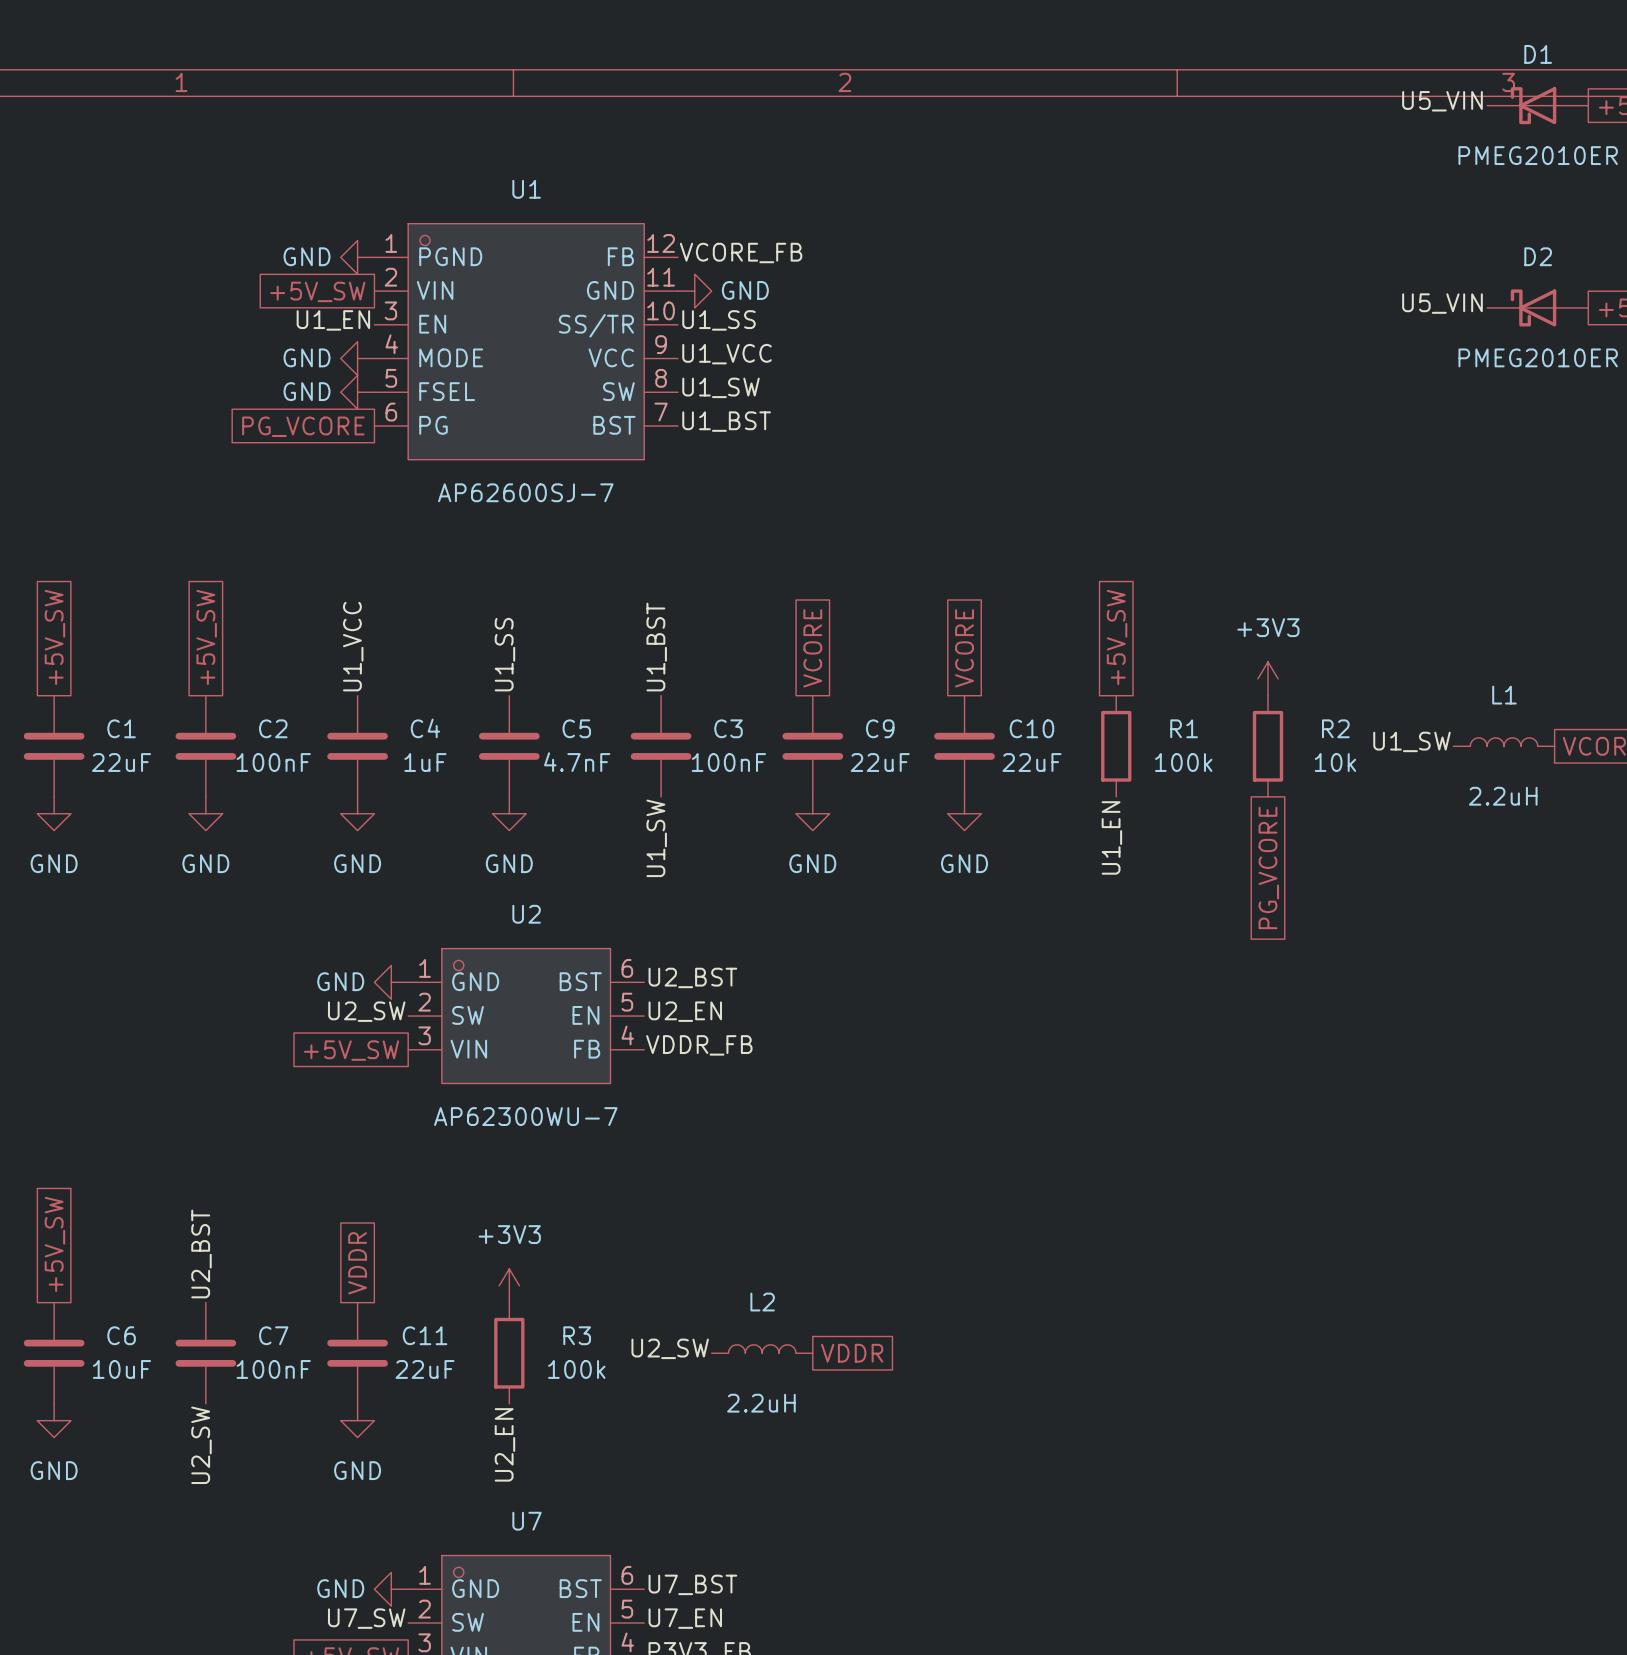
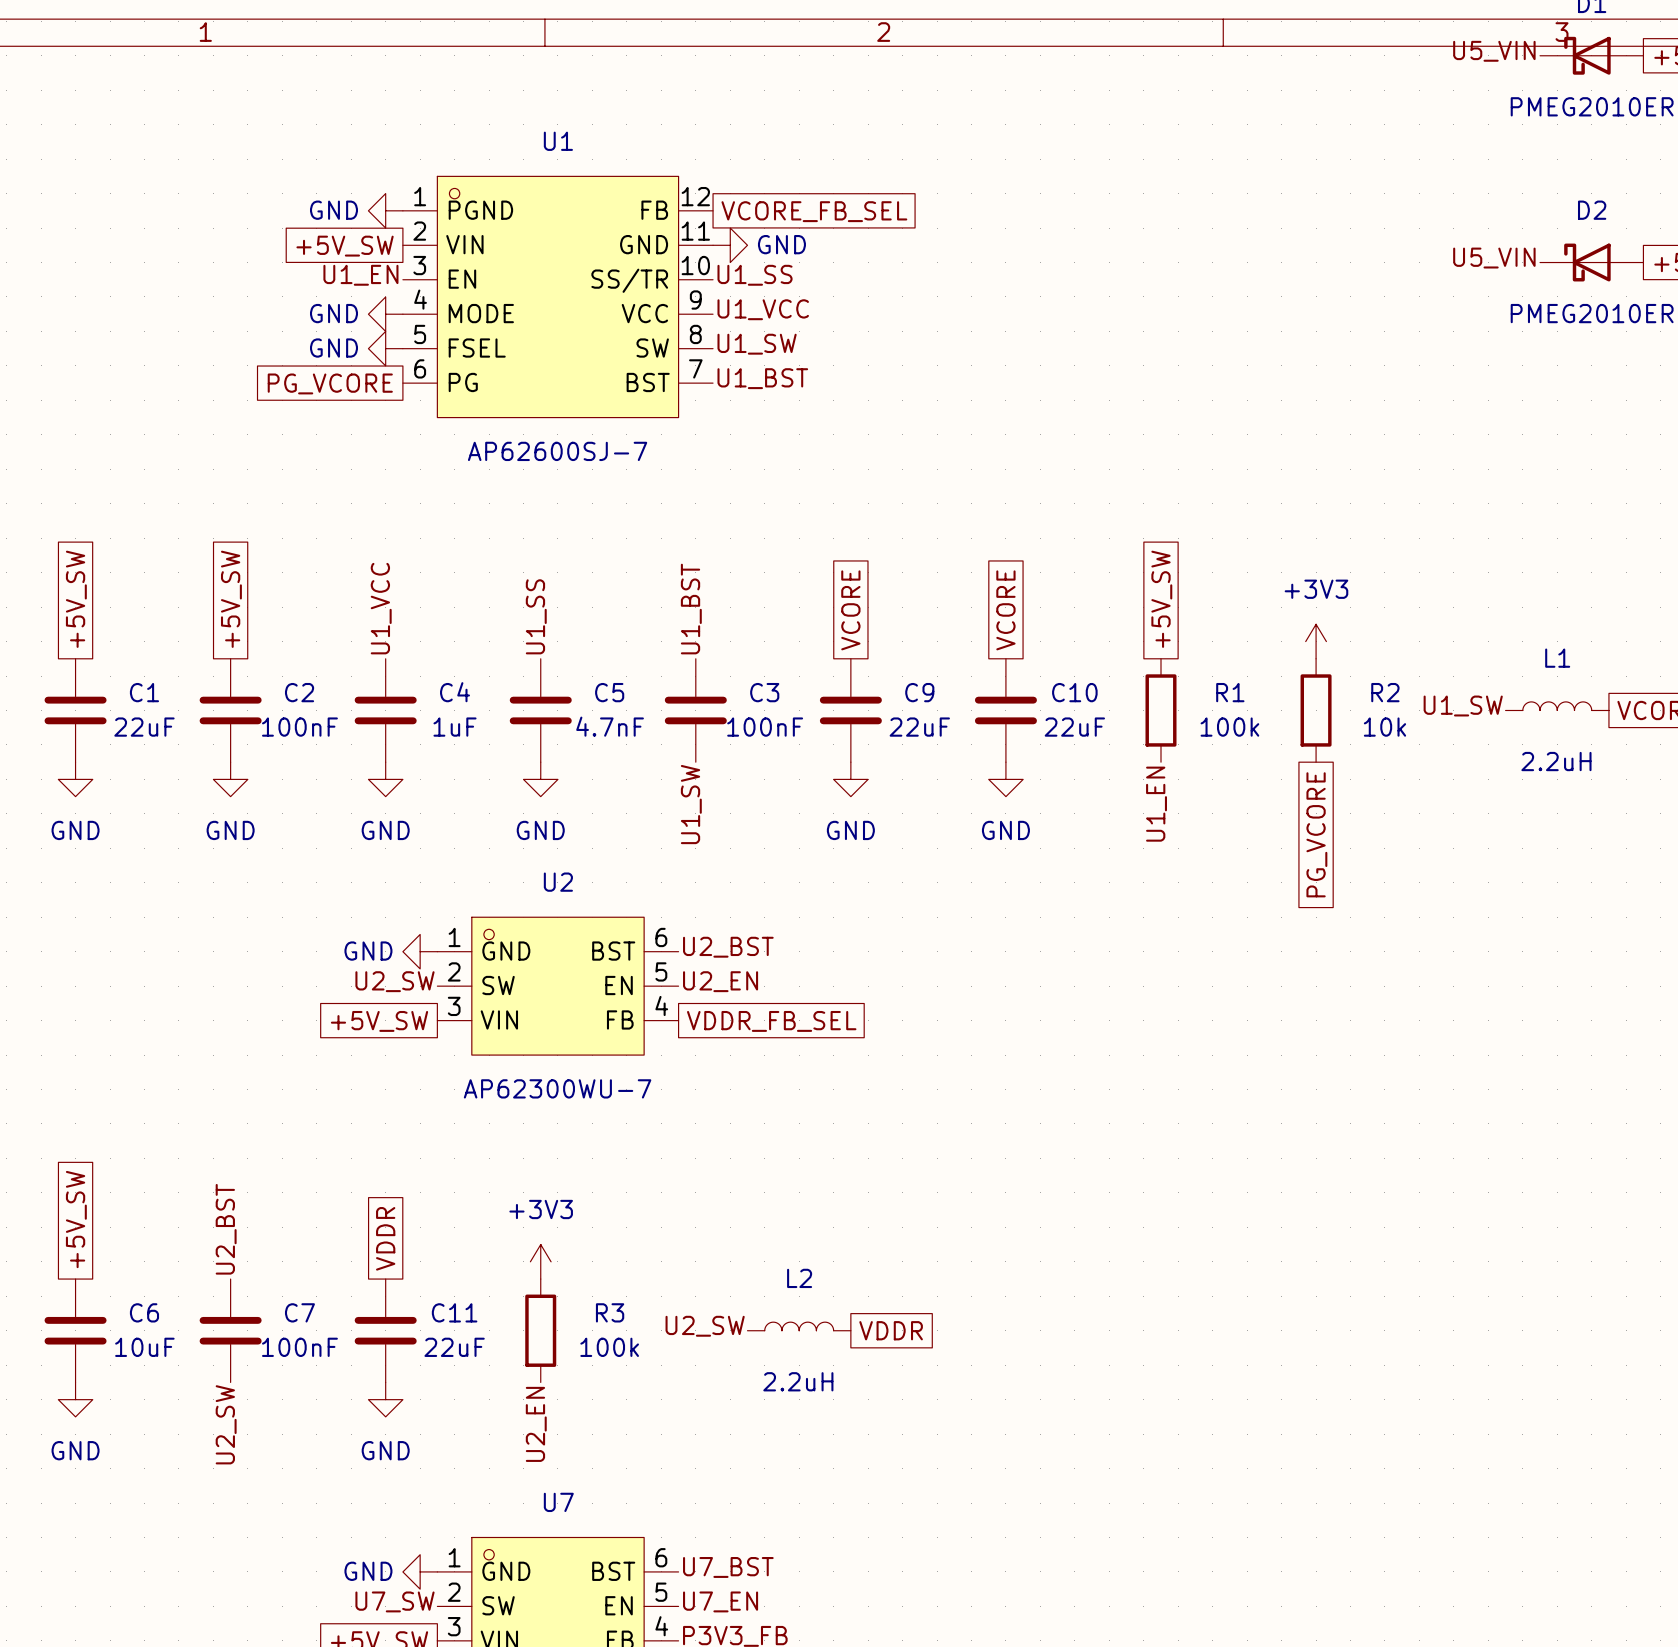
label: VCORE_FB (741, 252) -> none
global label: none -> VCORE_FB_SEL (814, 211)
label: VDDR_FB (699, 1045) -> none
global label: none -> VDDR_FB_SEL (771, 1021)

